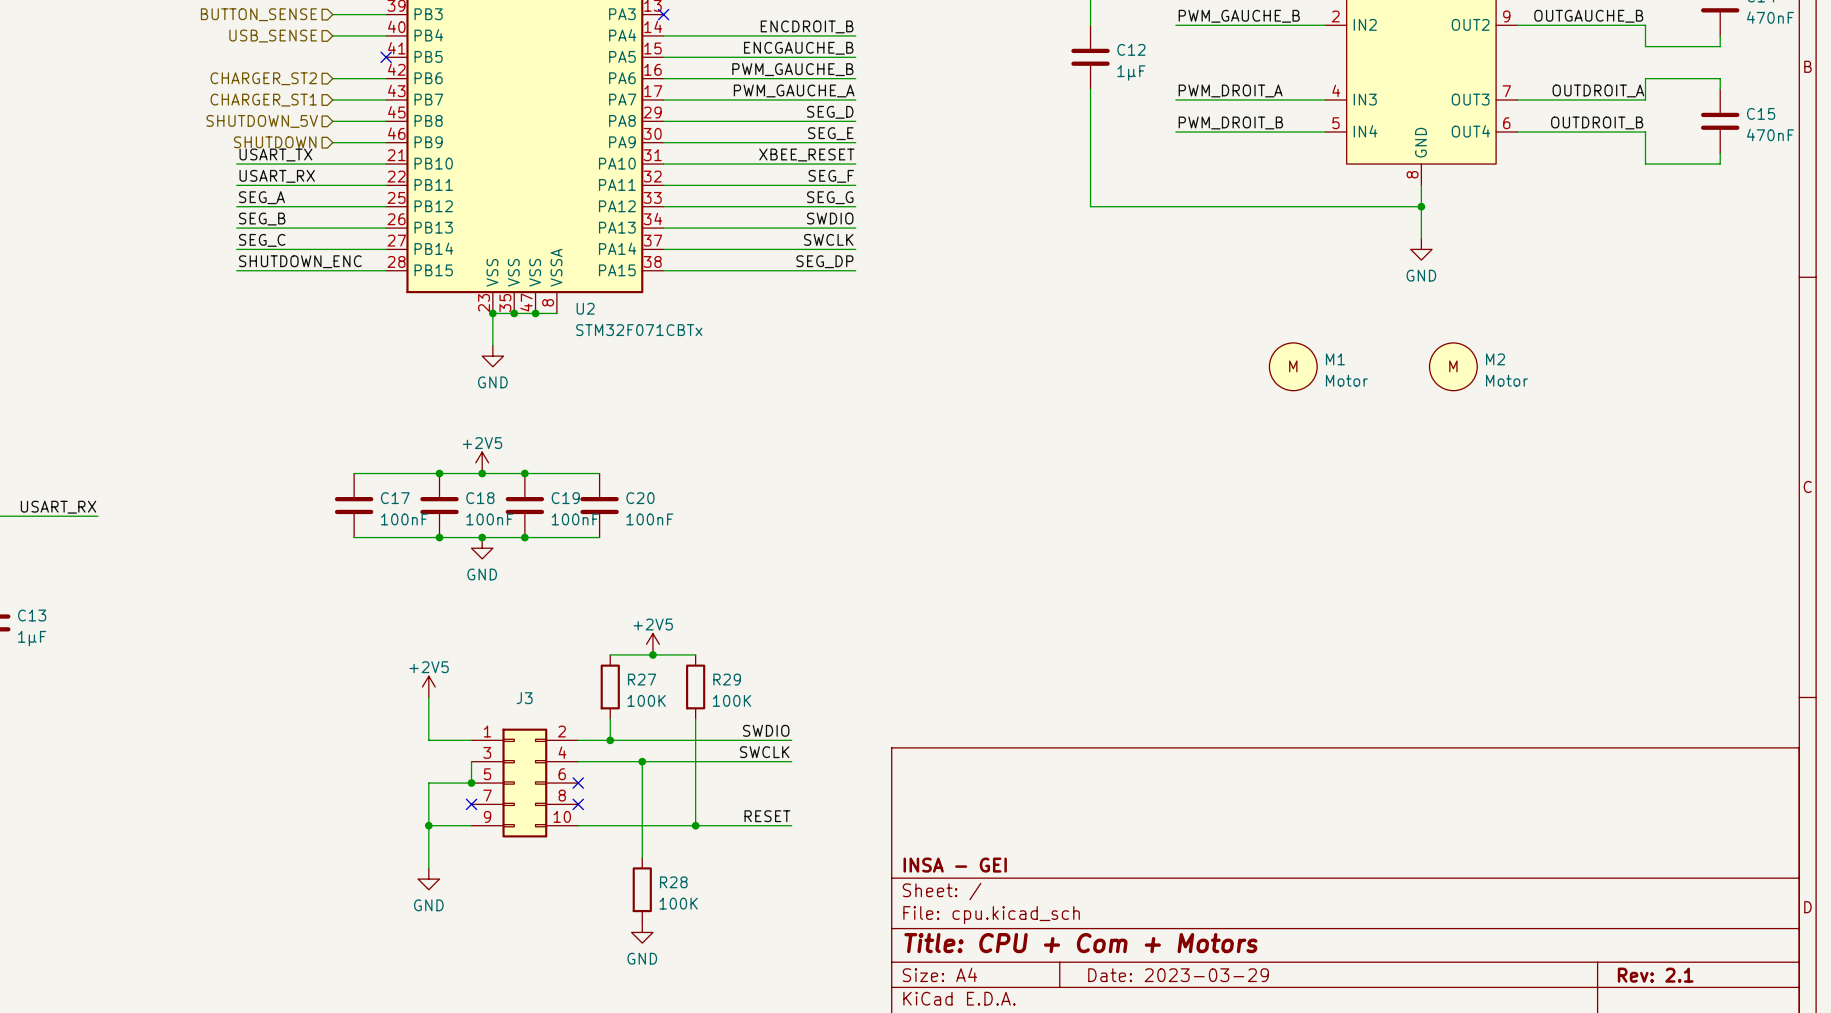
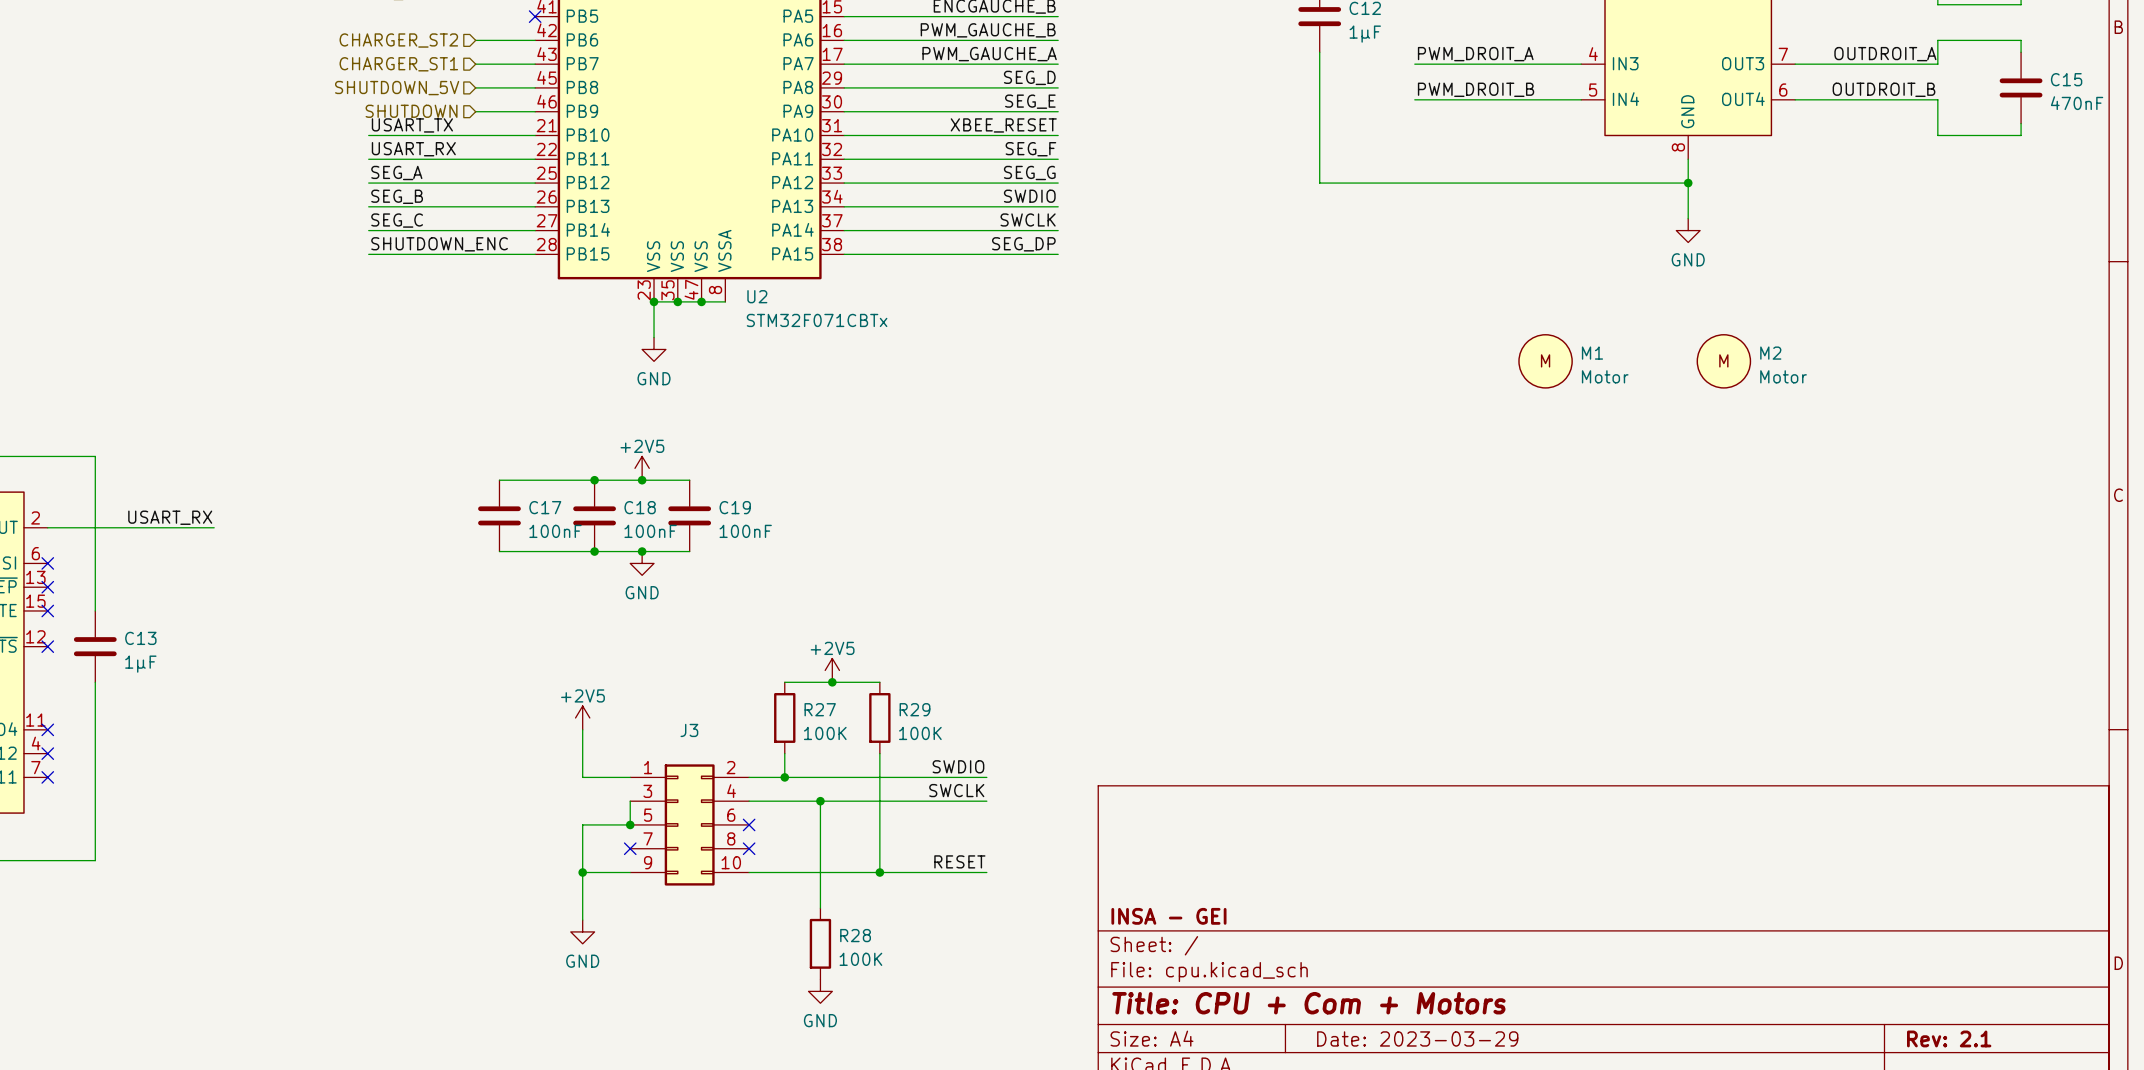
wire: (524, 473) (599, 473) -> none
junction: (524, 473) -> none
C20: 100nF (599, 505) -> none
wire: (524, 537) (599, 537) -> none
junction: (524, 537) -> none

